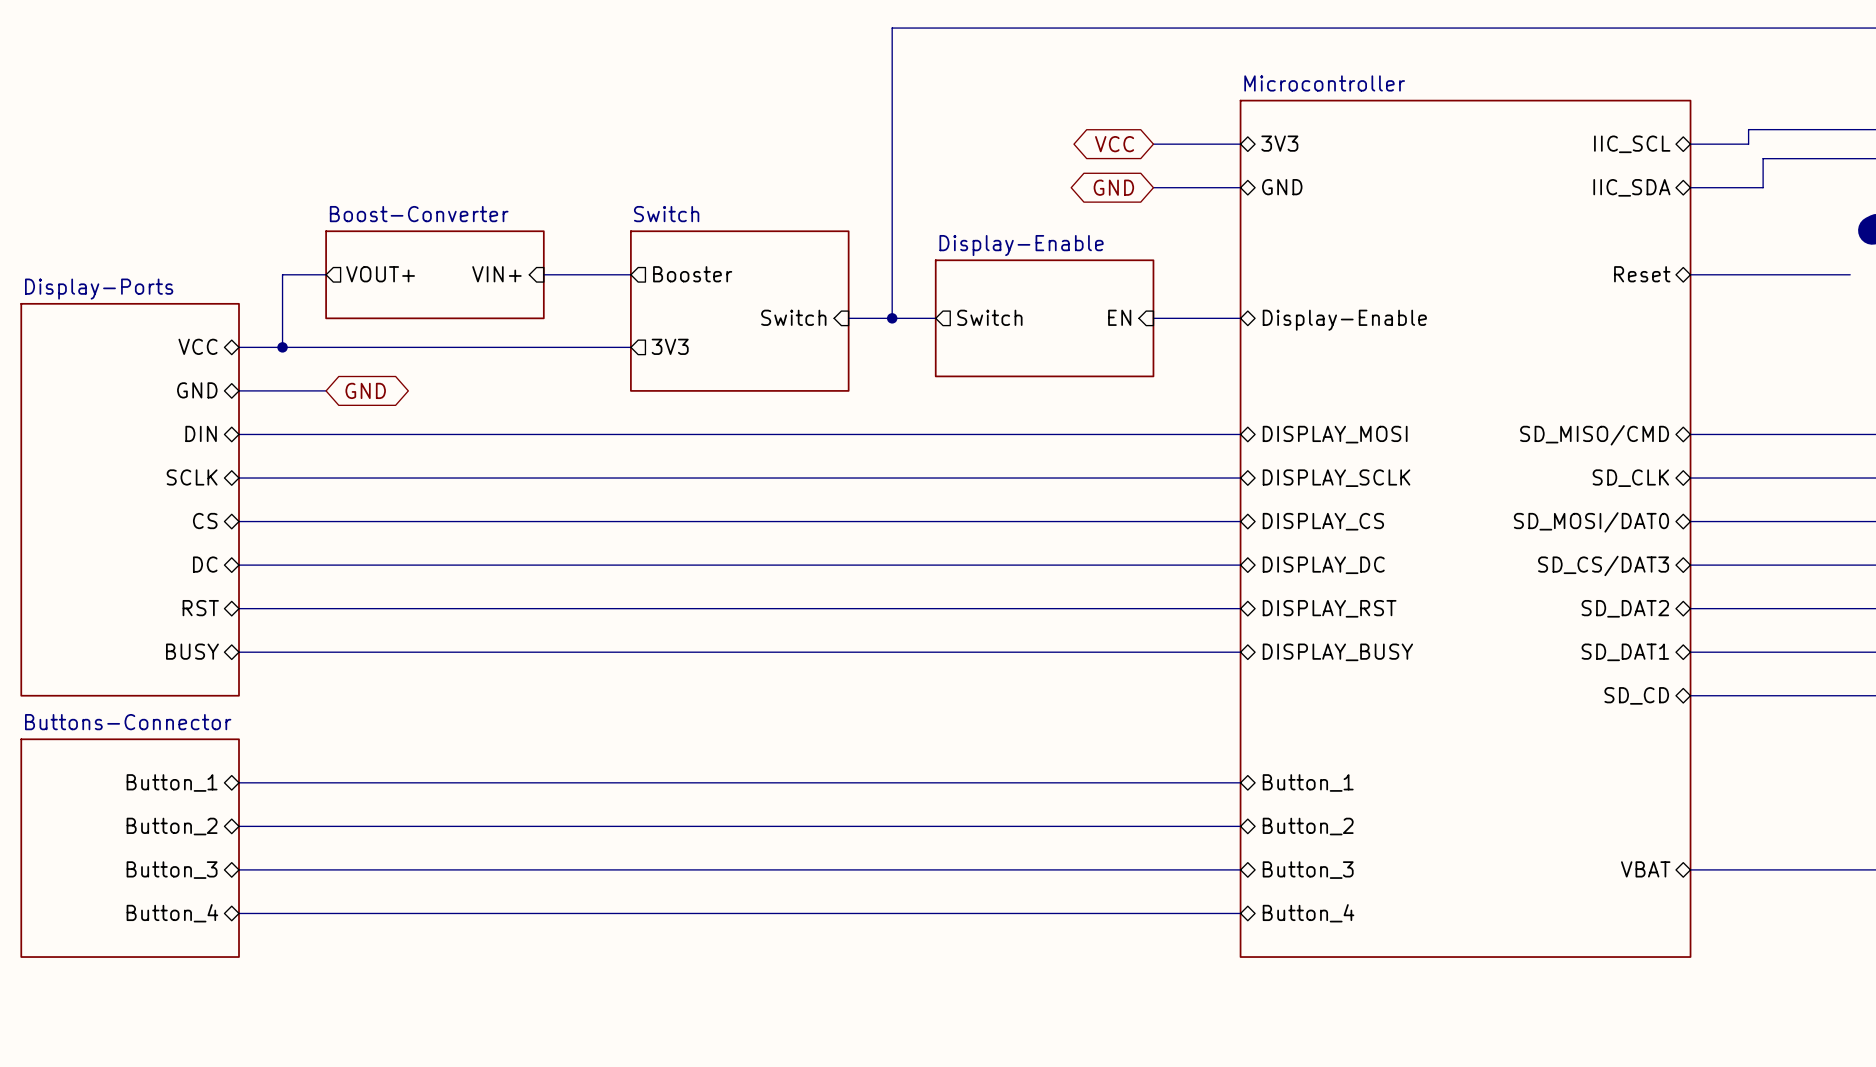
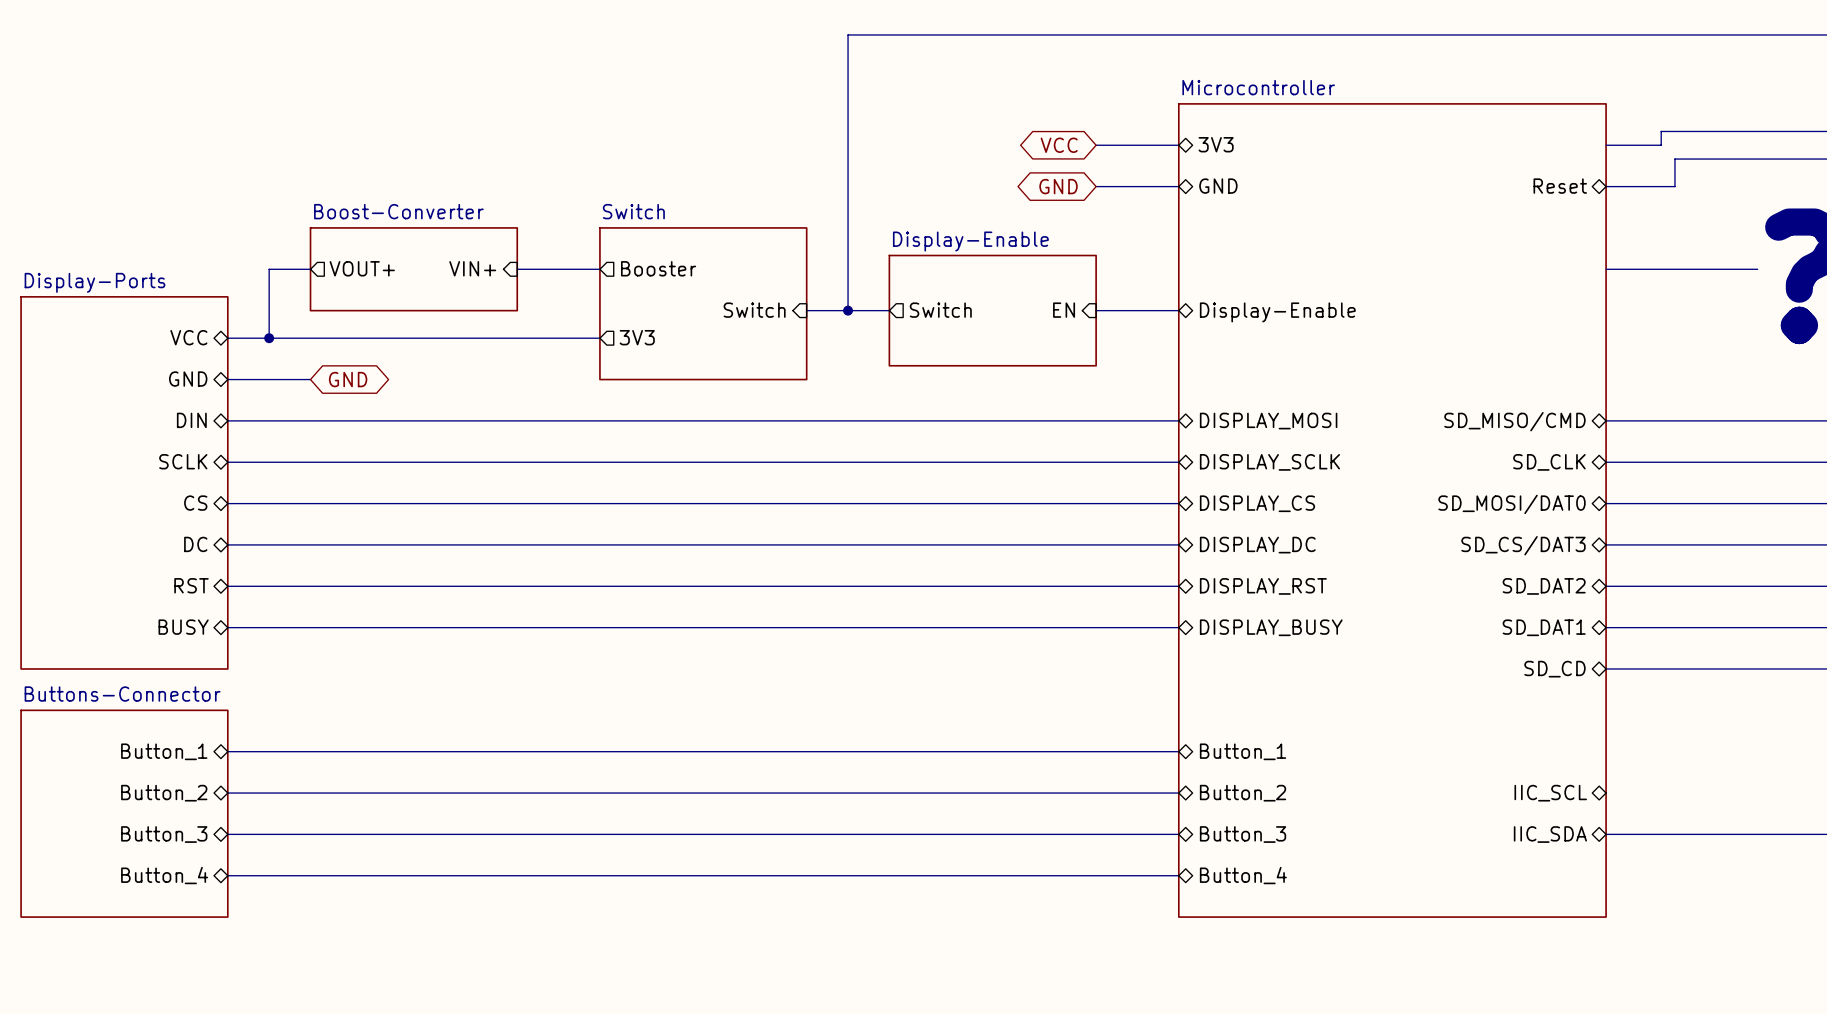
sheet pin: IIC_SCL (1632, 144) -> none
sheet pin: IIC_SDA (1631, 187) -> Reset (1560, 186)
sheet pin: Reset (1642, 274) -> none
sheet pin: none -> IIC_SCL (1550, 793)
sheet pin: VBAT (1645, 869) -> IIC_SDA (1550, 834)

